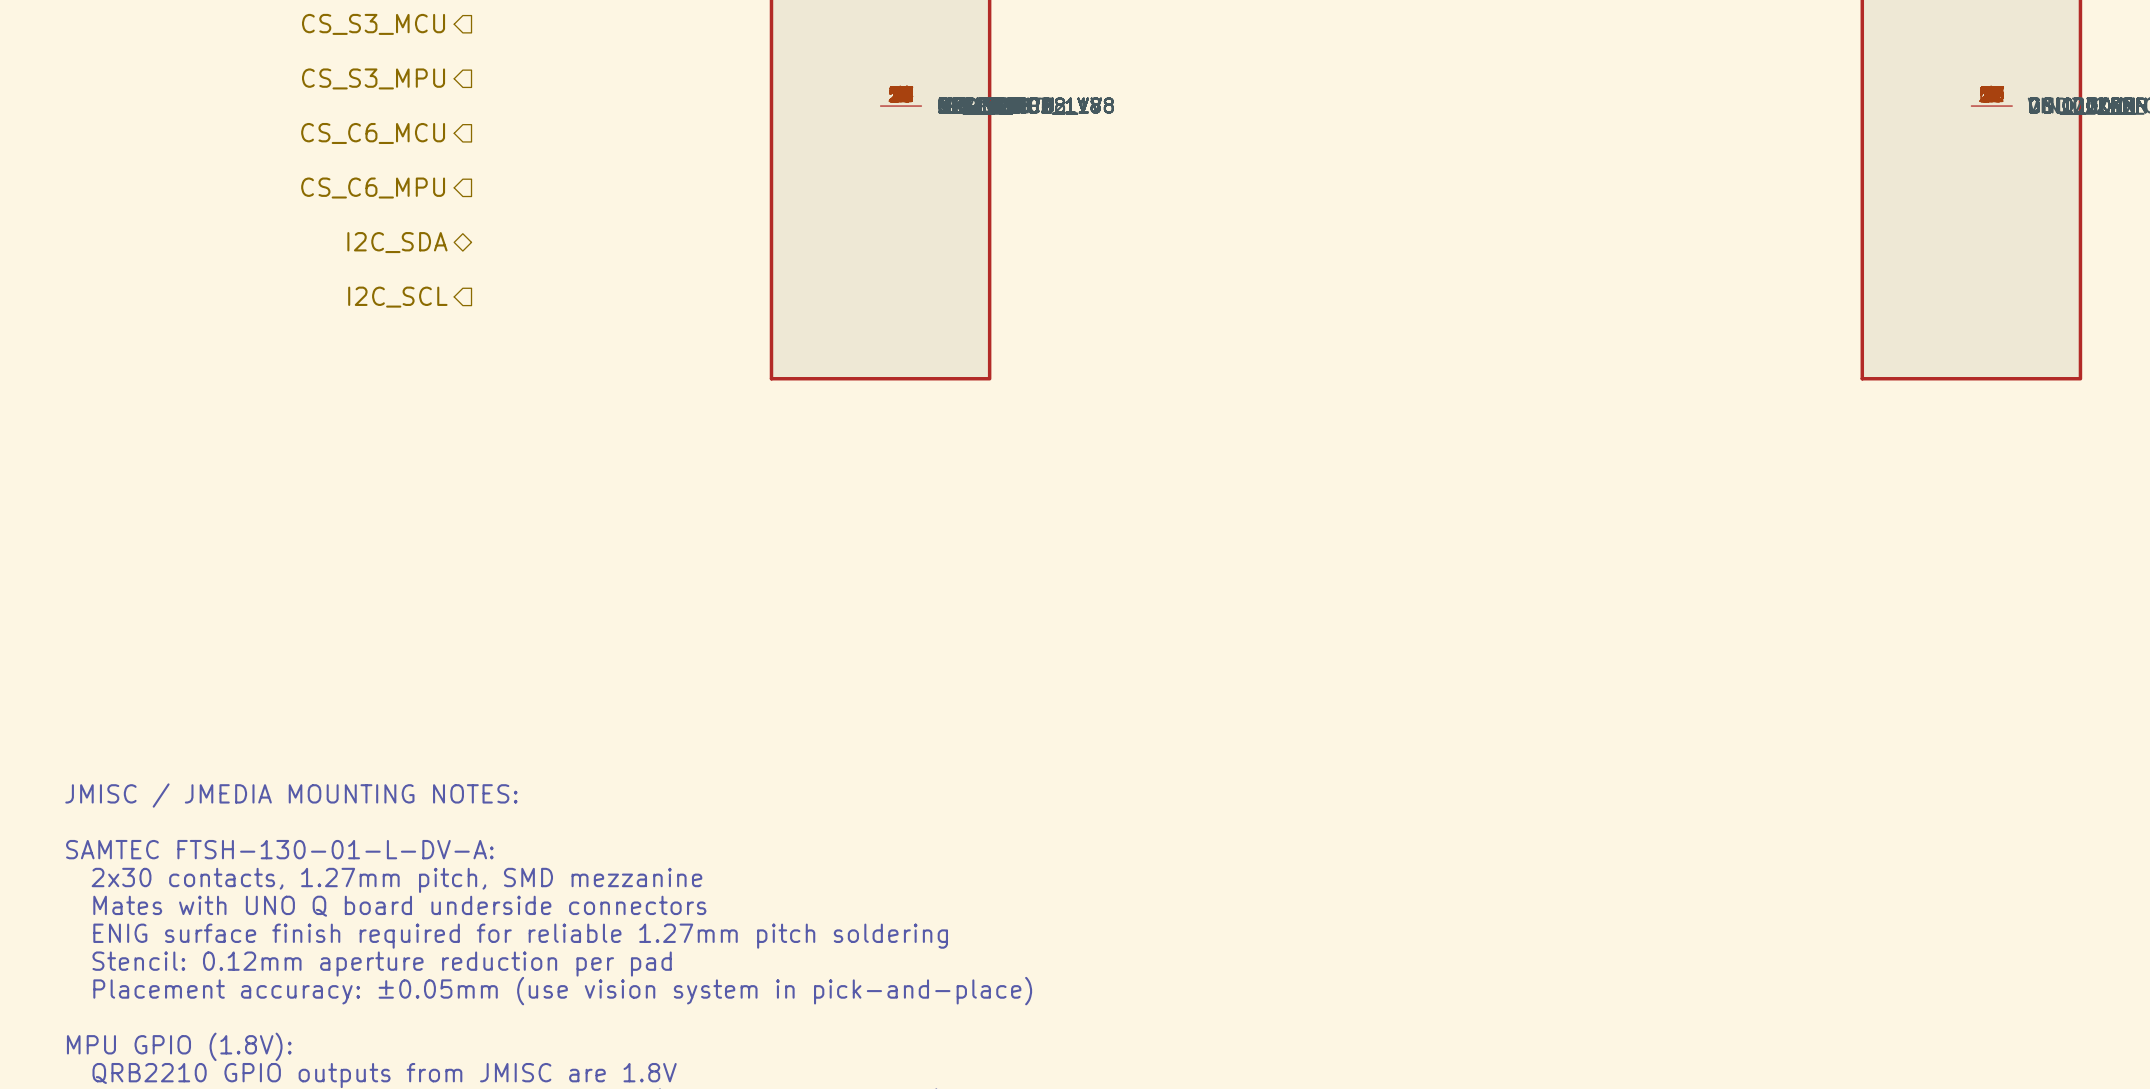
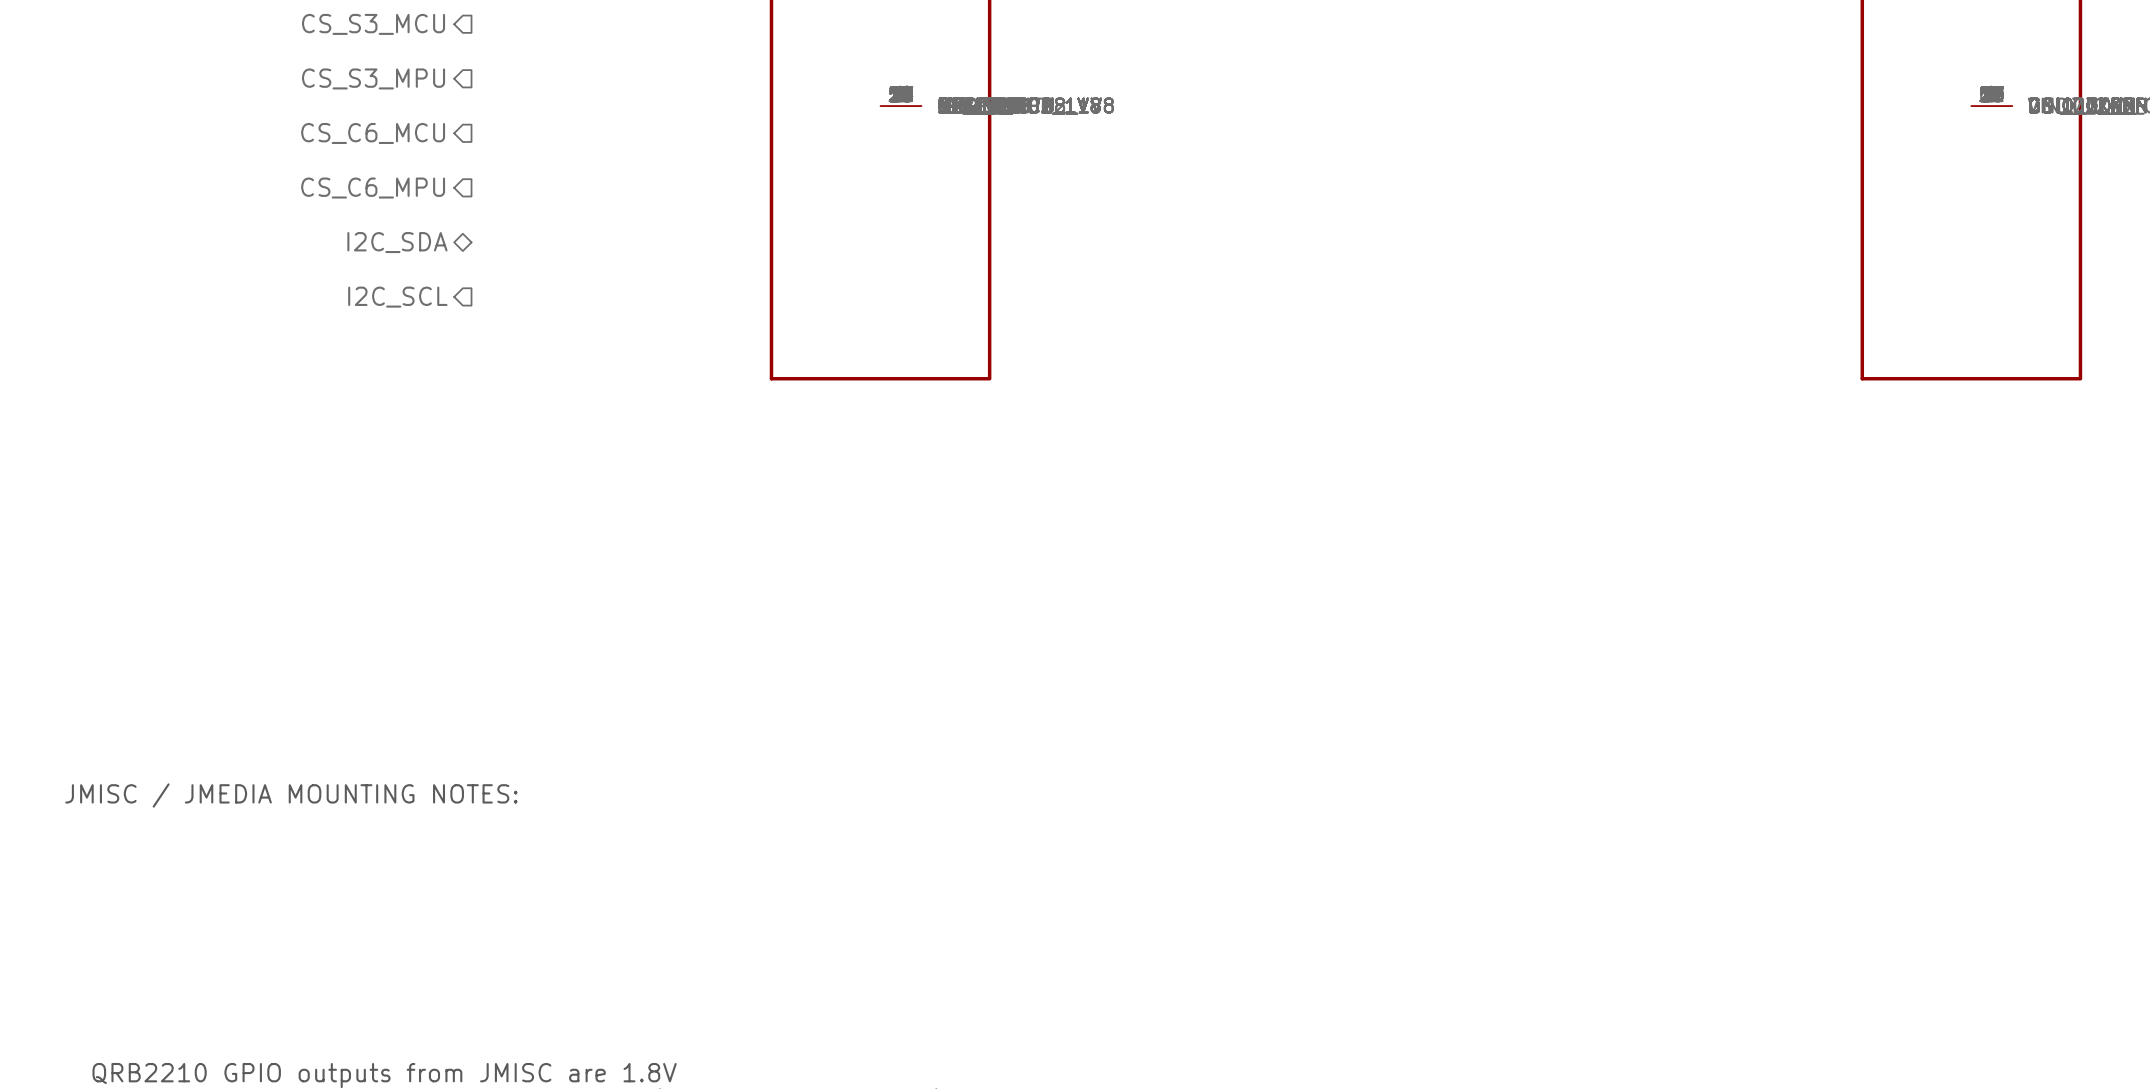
text: SAMTEC FTSH-130-01-L-DV-A: (279, 849) -> none
text: 2x30 contacts, 1.27mm pitch, SMD mezzanine (396, 880) -> none
text: Mates with UNO Q board underside connectors (399, 906) -> none
text: ENIG surface finish required for reliable 1.27mm pitch soldering (520, 936) -> none
text: Stencil: 0.12mm aperture reduction per pad (382, 964) -> none
text: Placement accuracy: ±0.05mm (use vision system in pick-and-place) (562, 991) -> none
text: MPU GPIO (1.8V): (179, 1046) -> none

